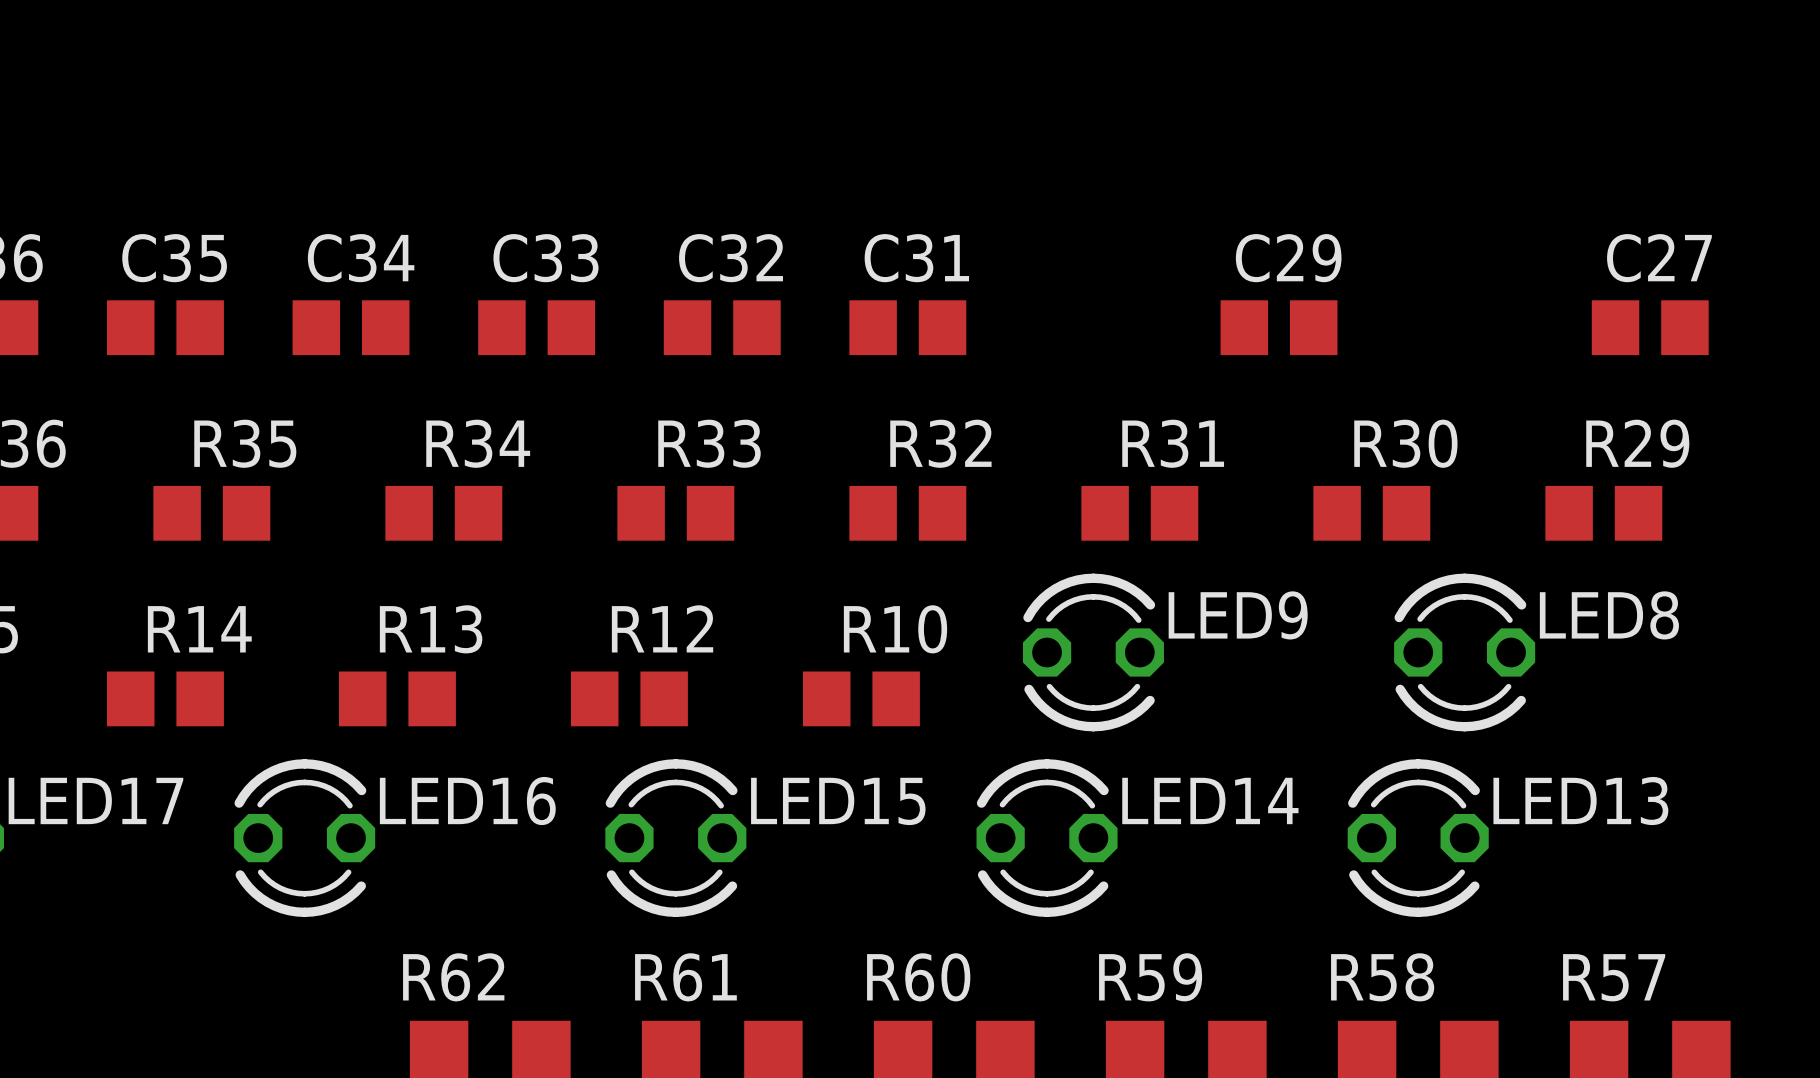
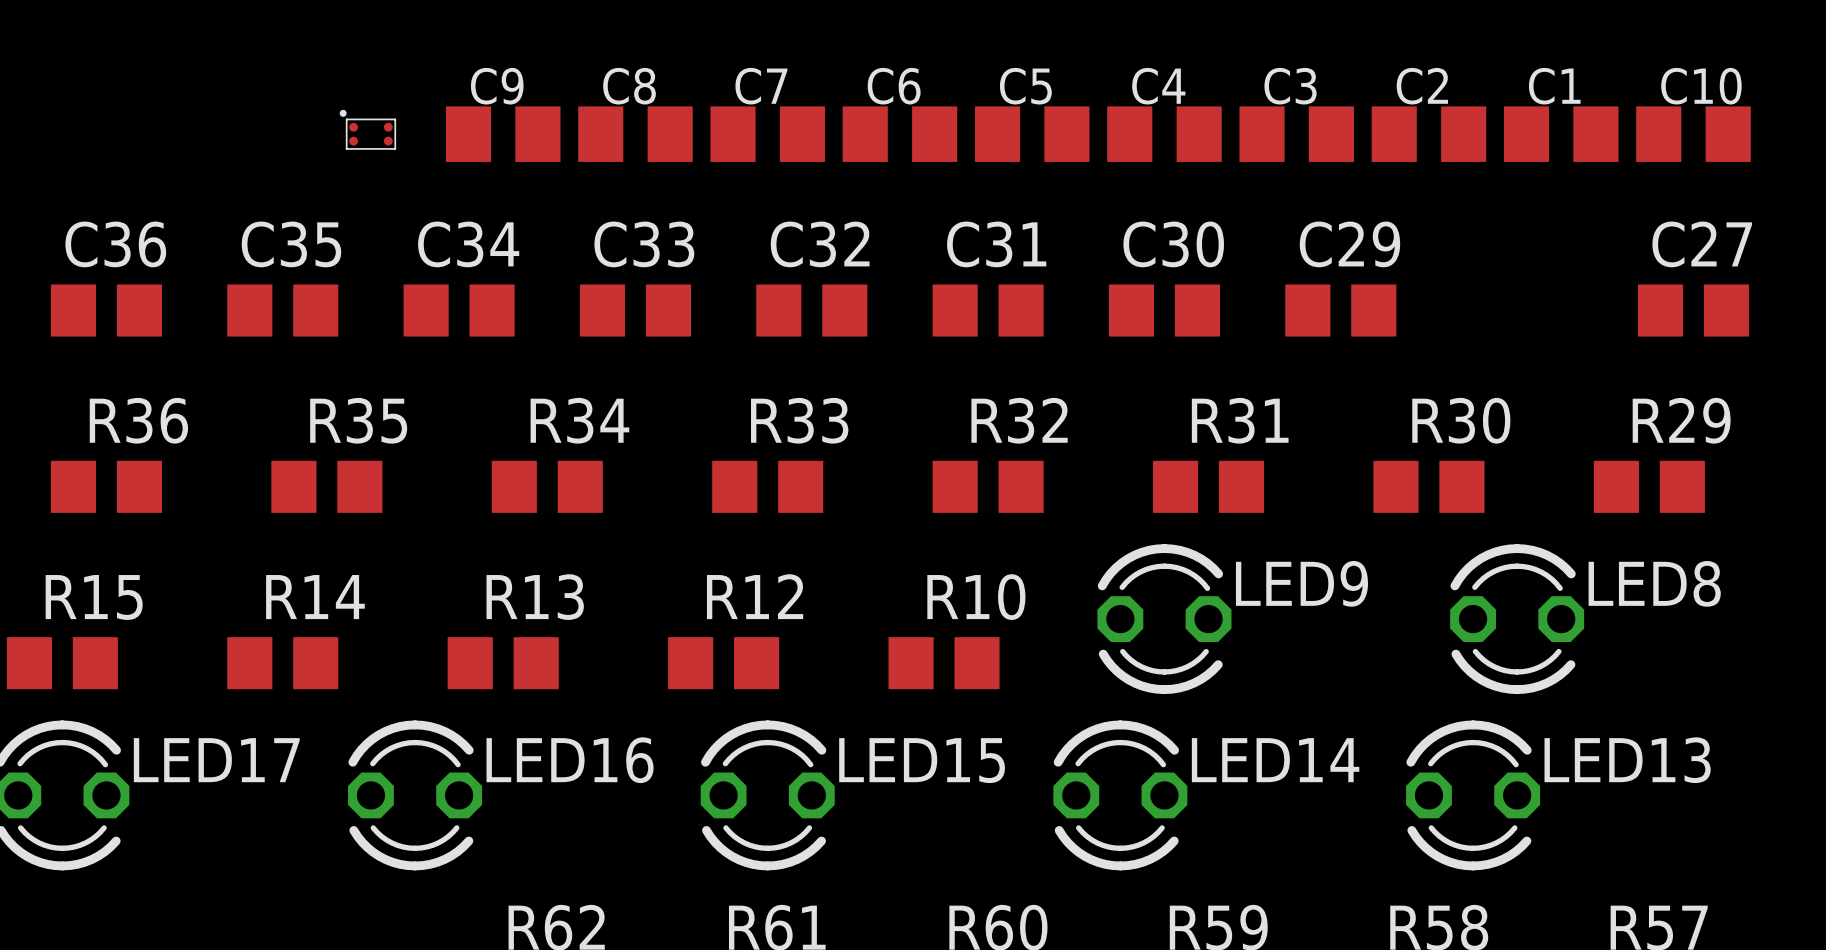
part: none -> (367, 129)
C9: none -> (503, 134)
C8: none -> (635, 134)
C7: none -> (767, 134)
C6: none -> (899, 134)
C5: none -> (1032, 134)
C4: none -> (1164, 134)
C3: none -> (1296, 134)
C2: none -> (1428, 134)
C1: none -> (1561, 134)
C10: none -> (1693, 134)
C30: none -> (1164, 310)

